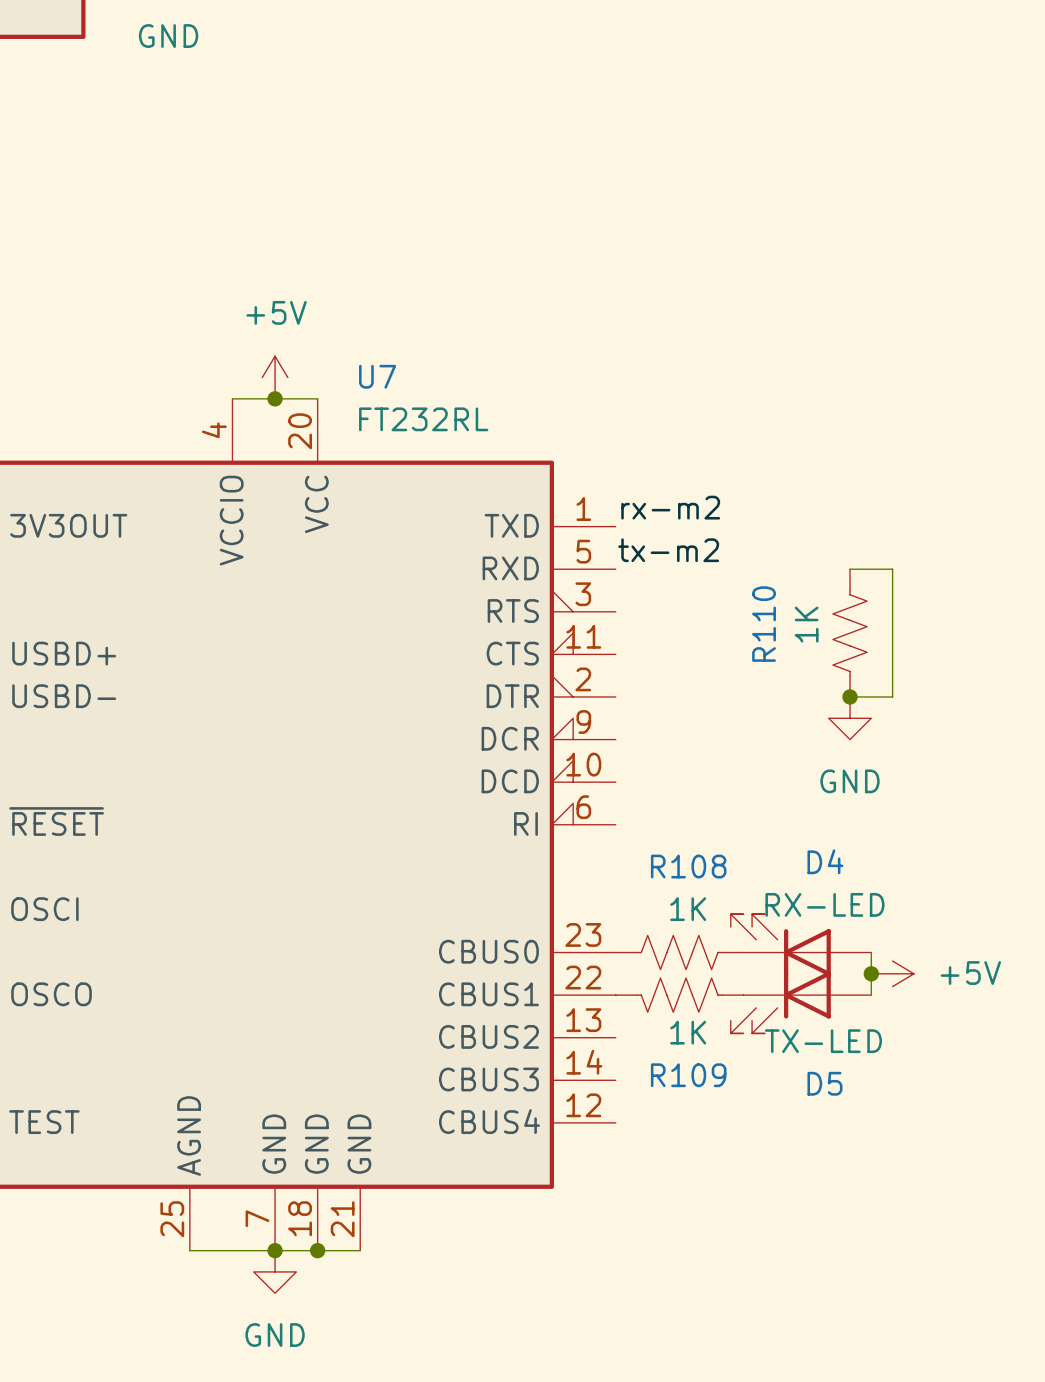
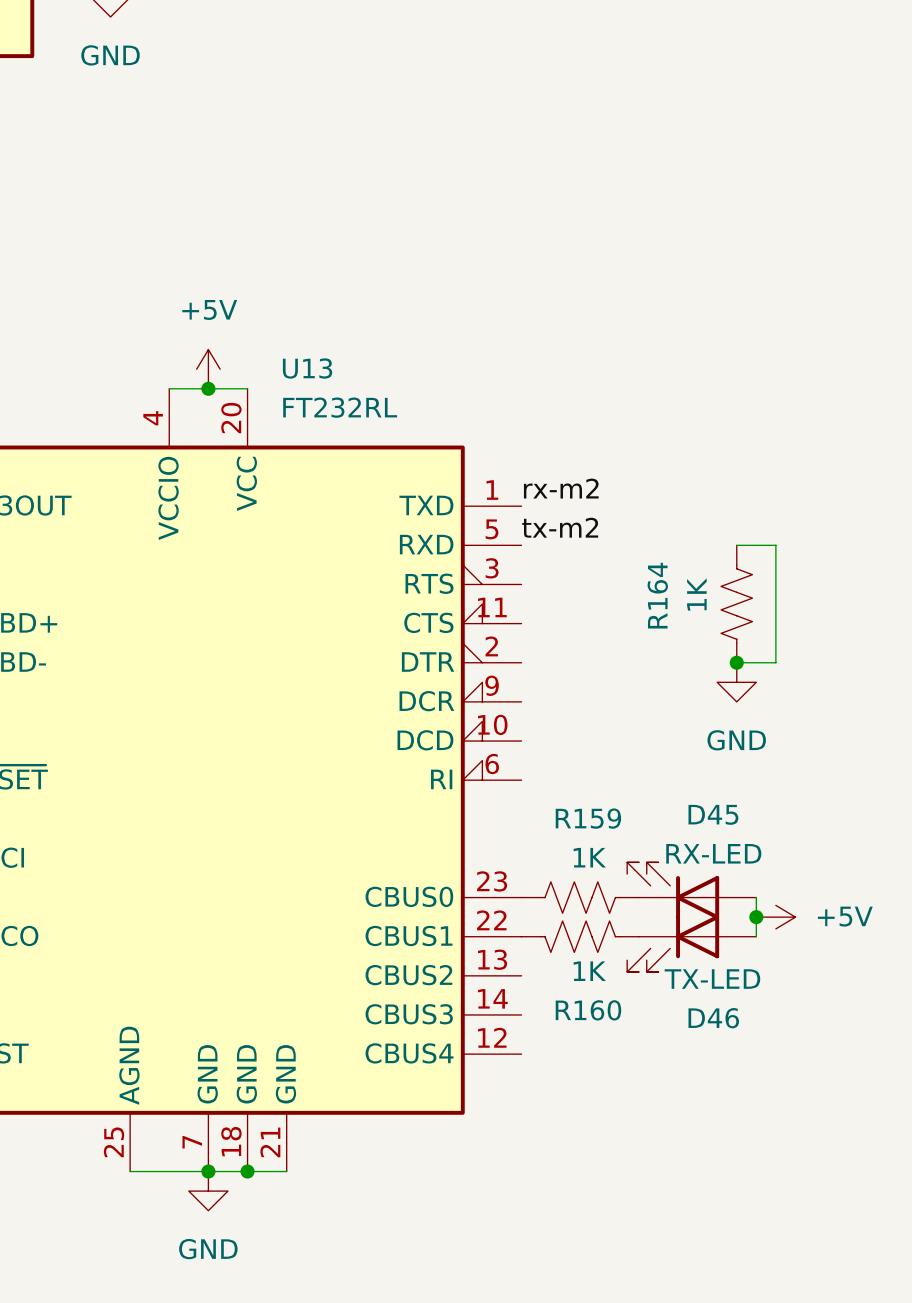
U7 name: U7 (377, 376) -> U13 (307, 368)
R110 name: R110 (764, 624) -> R164 (657, 595)
D4 name: D4 (825, 861) -> D45 (713, 814)
R108 name: R108 (688, 866) -> R159 (588, 818)
R109 name: R109 (688, 1075) -> R160 (588, 1010)
D5 name: D5 (824, 1083) -> D46 (713, 1018)

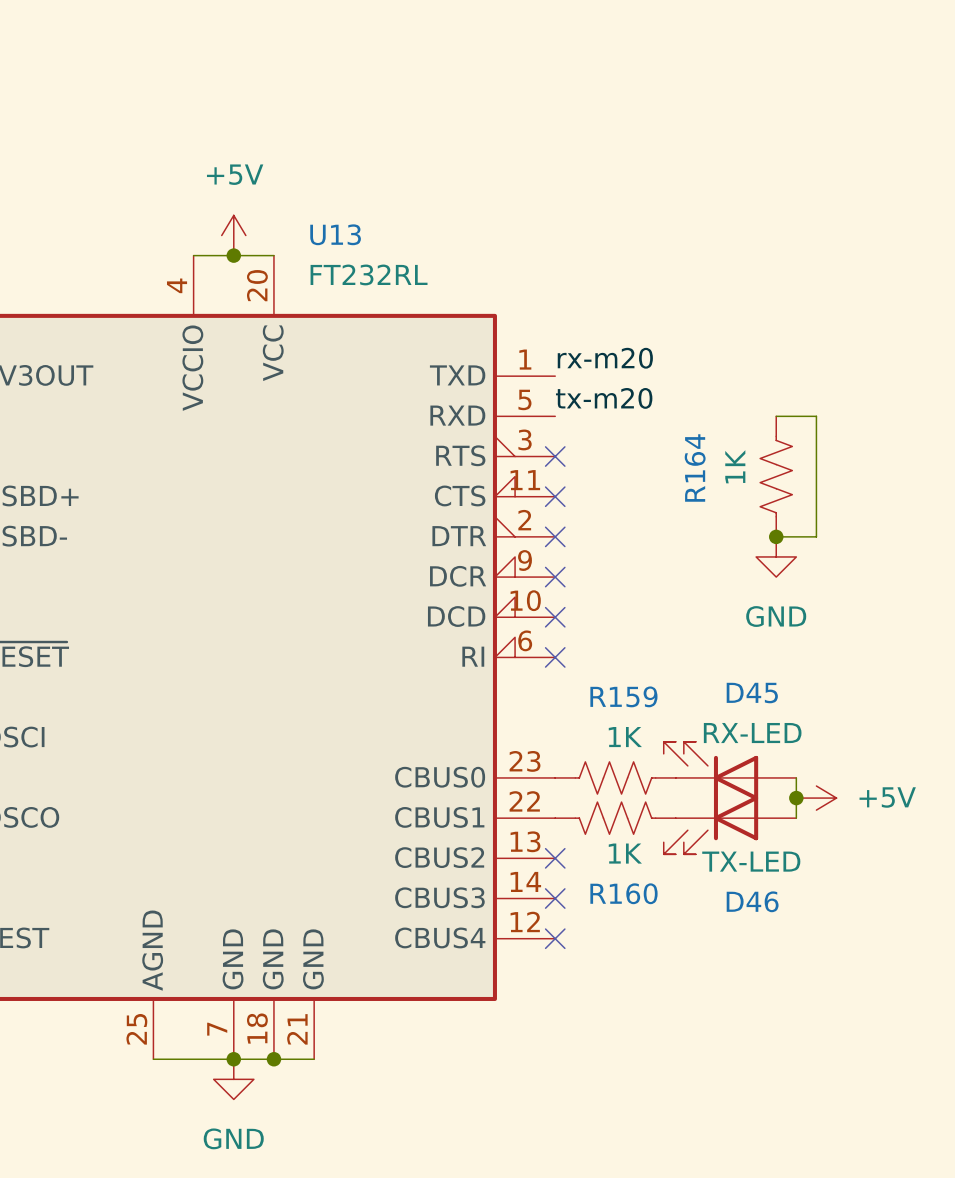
label: rx-m2 (561, 488) -> rx-m20 (605, 358)
label: tx-m2 (560, 527) -> tx-m20 (604, 398)
no-connect mark: none -> (555, 456)
no-connect mark: none -> (555, 496)
no-connect mark: none -> (555, 536)
no-connect mark: none -> (555, 577)
no-connect mark: none -> (555, 617)
no-connect mark: none -> (555, 657)
no-connect mark: none -> (555, 858)
no-connect mark: none -> (555, 898)
no-connect mark: none -> (555, 938)

